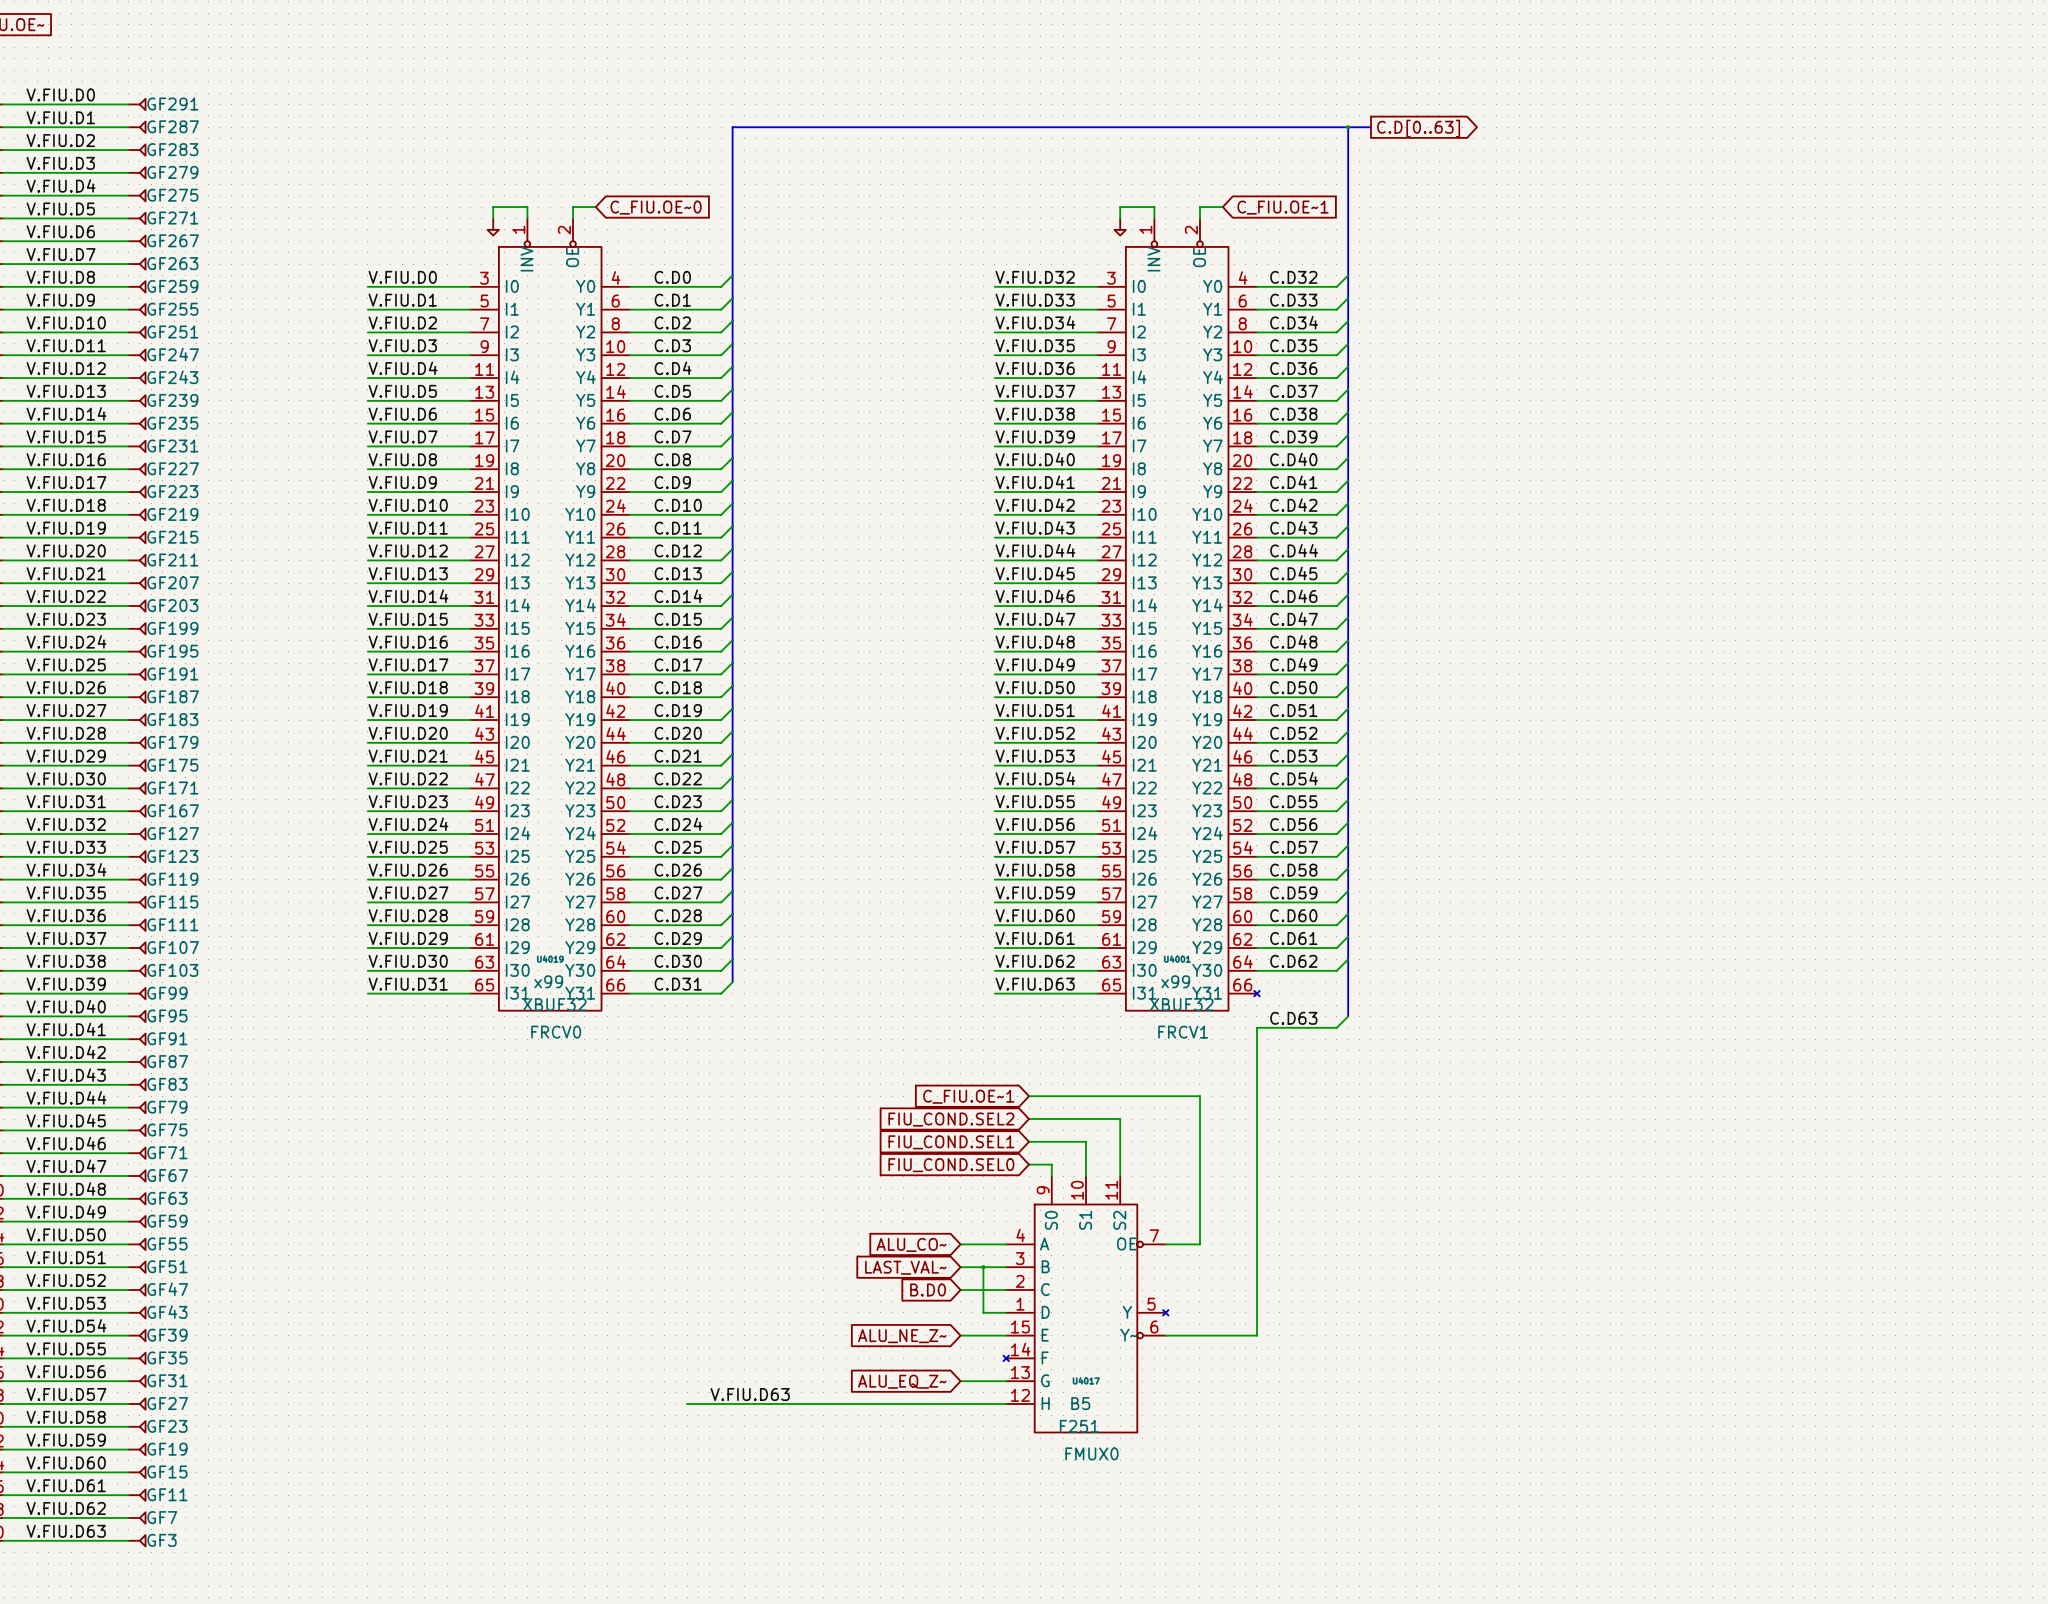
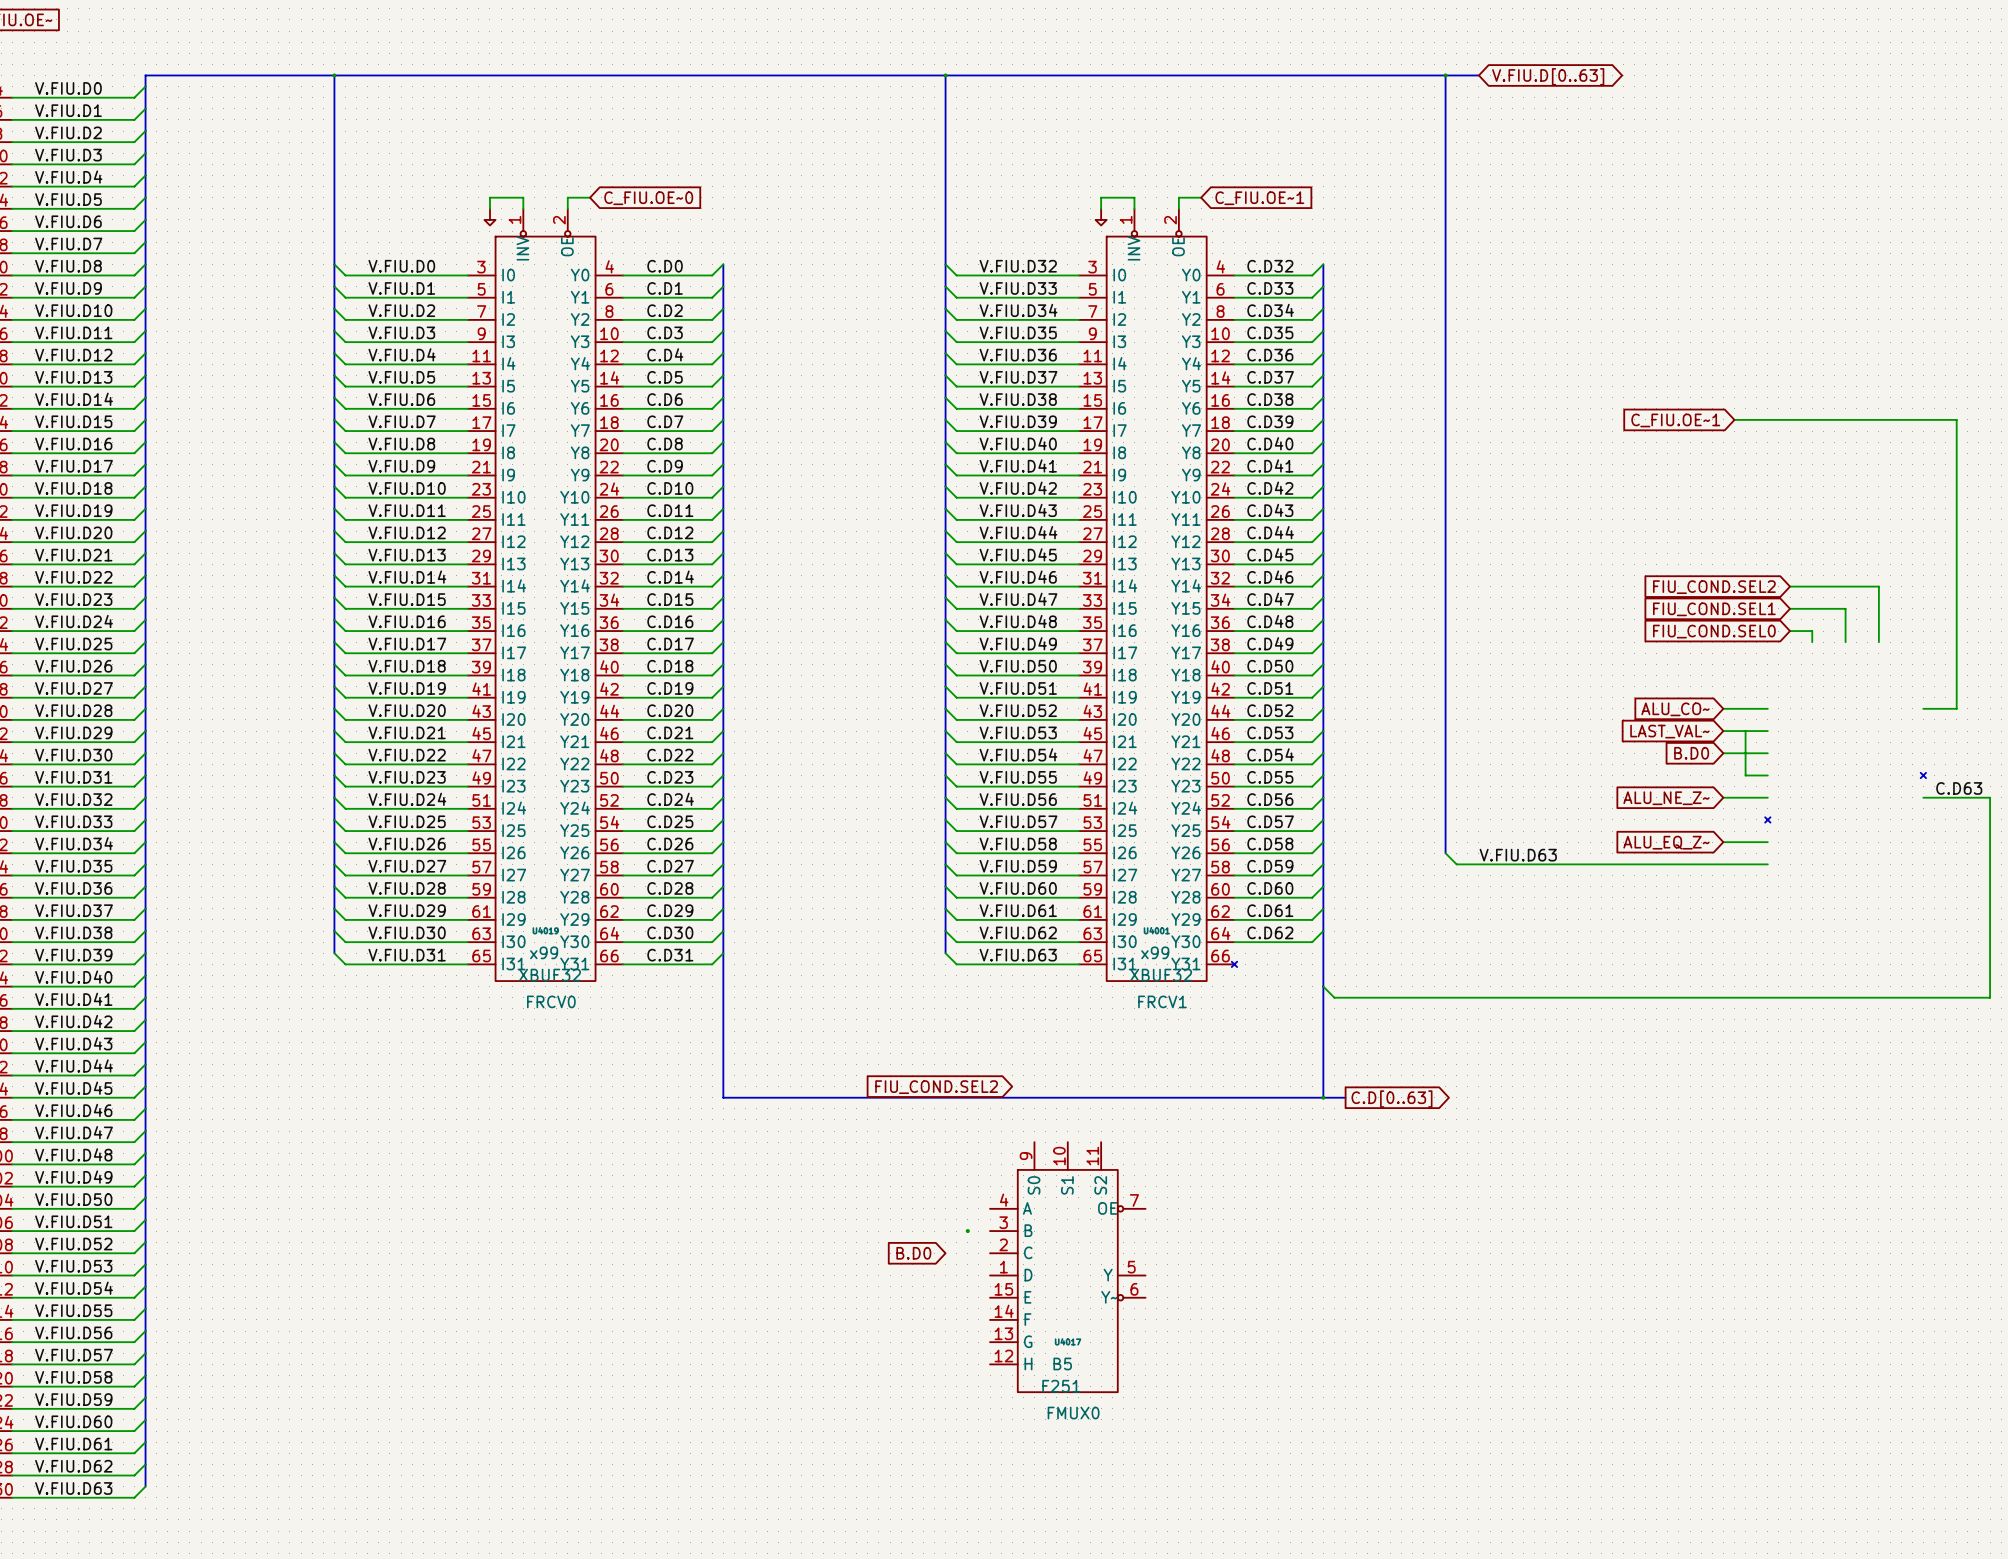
bus: none -> (334, 75) (334, 953)
junction: none -> (334, 75)
bus: none -> (945, 75) (945, 953)
junction: none -> (945, 75)
bus: none -> (1445, 75) (1445, 853)
junction: none -> (1445, 75)
bus: none -> (1478, 75) (145, 75) (145, 1486)
global label: none -> V.FIU.D[0..63] (1548, 76)
wire: none -> (145, 86) (134, 97)
GF291: (137, 104) -> none
wire: none -> (145, 108) (134, 119)
GF287: (137, 127) -> none
bus: (1348, 127) (1348, 275) -> none
junction: (1348, 127) -> none
bus: (1370, 127) (732, 127) (732, 275) -> none
global label: C.D[0..63] (1418, 128) -> none
wire: none -> (145, 131) (134, 142)
GF283: (137, 150) -> none
wire: none -> (145, 153) (134, 164)
GF279: (137, 172) -> none
wire: none -> (145, 175) (134, 186)
GF275: (137, 195) -> none
wire: none -> (145, 197) (134, 208)
GF271: (137, 218) -> none
wire: none -> (145, 219) (134, 231)
GF267: (137, 241) -> none
wire: none -> (145, 242) (134, 253)
GF263: (137, 264) -> none
wire: none -> (145, 264) (134, 275)
wire: none -> (334, 264) (345, 275) (367, 275)
wire: none -> (945, 264) (956, 275) (978, 275)
GF259: (137, 286) -> none
wire: none -> (145, 286) (134, 297)
wire: none -> (334, 286) (345, 297) (367, 297)
wire: none -> (945, 286) (956, 297) (978, 297)
GF255: (137, 309) -> none
wire: none -> (145, 308) (134, 319)
wire: none -> (334, 308) (345, 319) (367, 319)
wire: none -> (945, 308) (956, 319) (978, 319)
GF251: (137, 332) -> none
wire: none -> (145, 331) (134, 342)
wire: none -> (334, 331) (345, 342) (367, 342)
wire: none -> (945, 331) (956, 342) (978, 342)
GF247: (137, 355) -> none
wire: none -> (145, 353) (134, 364)
wire: none -> (334, 353) (345, 364) (367, 364)
wire: none -> (945, 353) (956, 364) (978, 364)
GF243: (137, 378) -> none
wire: none -> (145, 375) (134, 386)
wire: none -> (334, 375) (345, 386) (367, 386)
wire: none -> (945, 375) (956, 386) (978, 386)
GF239: (137, 400) -> none
wire: none -> (145, 397) (134, 408)
wire: none -> (334, 397) (345, 408) (367, 408)
wire: none -> (945, 397) (956, 408) (978, 408)
GF235: (137, 423) -> none
wire: none -> (145, 419) (134, 431)
wire: none -> (334, 419) (345, 431) (367, 431)
wire: none -> (945, 419) (956, 431) (978, 431)
global label: none -> C_FIU.OE~1 (1675, 420)
wire: none -> (1734, 419) (1956, 419) (1956, 708) (1923, 708)
GF231: (137, 446) -> none
wire: none -> (145, 442) (134, 453)
wire: none -> (334, 442) (345, 453) (367, 453)
wire: none -> (945, 442) (956, 453) (978, 453)
GF227: (137, 469) -> none
wire: none -> (145, 464) (134, 475)
wire: none -> (334, 464) (345, 475) (367, 475)
wire: none -> (945, 464) (956, 475) (978, 475)
GF223: (137, 492) -> none
wire: none -> (145, 486) (134, 497)
wire: none -> (334, 486) (345, 497) (367, 497)
wire: none -> (945, 486) (956, 497) (978, 497)
GF219: (137, 514) -> none
wire: none -> (145, 508) (134, 519)
wire: none -> (334, 508) (345, 519) (367, 519)
wire: none -> (945, 508) (956, 519) (978, 519)
GF215: (137, 537) -> none
wire: none -> (145, 531) (134, 542)
wire: none -> (334, 531) (345, 542) (367, 542)
wire: none -> (945, 531) (956, 542) (978, 542)
GF211: (137, 560) -> none
wire: none -> (145, 553) (134, 564)
wire: none -> (334, 553) (345, 564) (367, 564)
wire: none -> (945, 553) (956, 564) (978, 564)
GF207: (137, 583) -> none
wire: none -> (145, 575) (134, 586)
wire: none -> (334, 575) (345, 586) (367, 586)
wire: none -> (945, 575) (956, 586) (978, 586)
GF203: (137, 606) -> none
global label: none -> FIU_COND.SEL2 (1714, 587)
wire: none -> (1790, 586) (1878, 586) (1878, 642)
wire: none -> (145, 597) (134, 608)
wire: none -> (334, 597) (345, 608) (367, 608)
wire: none -> (945, 597) (956, 608) (978, 608)
GF199: (137, 628) -> none
wire: none -> (1790, 608) (1845, 608) (1845, 642)
global label: none -> FIU_COND.SEL1 (1714, 609)
wire: none -> (145, 619) (134, 631)
wire: none -> (334, 619) (345, 631) (367, 631)
wire: none -> (945, 619) (956, 631) (978, 631)
GF195: (137, 651) -> none
wire: none -> (1790, 631) (1812, 631) (1812, 642)
global label: none -> FIU_COND.SEL0 (1714, 631)
wire: none -> (145, 642) (134, 653)
wire: none -> (334, 642) (345, 653) (367, 653)
wire: none -> (945, 642) (956, 653) (978, 653)
GF191: (137, 674) -> none
wire: none -> (145, 664) (134, 675)
wire: none -> (334, 664) (345, 675) (367, 675)
wire: none -> (945, 664) (956, 675) (978, 675)
GF187: (137, 697) -> none
wire: none -> (145, 686) (134, 697)
wire: none -> (334, 686) (345, 697) (367, 697)
wire: none -> (945, 686) (956, 697) (978, 697)
GF183: (137, 720) -> none
wire: none -> (145, 708) (134, 719)
wire: none -> (334, 708) (345, 719) (367, 719)
wire: none -> (945, 708) (956, 719) (978, 719)
global label: none -> ALU_CO~ (1675, 709)
wire: none -> (1723, 708) (1767, 708)
GF179: (137, 742) -> none
wire: none -> (145, 731) (134, 742)
wire: none -> (334, 731) (345, 742) (367, 742)
wire: none -> (945, 731) (956, 742) (978, 742)
global label: none -> LAST_VAL~ (1669, 731)
wire: none -> (1723, 731) (1767, 731)
wire: none -> (1745, 731) (1745, 775) (1767, 775)
GF175: (137, 765) -> none
wire: none -> (145, 753) (134, 764)
wire: none -> (334, 753) (345, 764) (367, 764)
wire: none -> (945, 753) (956, 764) (978, 764)
global label: none -> B.D0 (1691, 753)
wire: none -> (1723, 753) (1767, 753)
GF171: (137, 788) -> none
wire: none -> (145, 775) (134, 786)
wire: none -> (334, 775) (345, 786) (367, 786)
wire: none -> (945, 775) (956, 786) (978, 786)
no-connect mark: none -> (1923, 775)
GF167: (137, 811) -> none
label: none -> C.D63 (1959, 788)
wire: none -> (145, 797) (134, 808)
wire: none -> (334, 797) (345, 808) (367, 808)
wire: none -> (945, 797) (956, 808) (978, 808)
wire: none -> (1723, 797) (1767, 797)
global label: none -> ALU_NE_Z~ (1666, 798)
GF127: (137, 834) -> none
wire: none -> (145, 819) (134, 831)
wire: none -> (334, 819) (345, 831) (367, 831)
wire: none -> (945, 819) (956, 831) (978, 831)
no-connect mark: none -> (1767, 819)
GF123: (137, 856) -> none
wire: none -> (145, 842) (134, 853)
wire: none -> (334, 842) (345, 853) (367, 853)
wire: none -> (945, 842) (956, 853) (978, 853)
global label: none -> ALU_EQ_Z~ (1666, 842)
wire: none -> (1723, 842) (1767, 842)
GF119: (137, 879) -> none
wire: none -> (1445, 853) (1456, 864) (1767, 864)
label: none -> V.FIU.D63 (1518, 855)
wire: none -> (145, 864) (134, 875)
wire: none -> (334, 864) (345, 875) (367, 875)
wire: none -> (945, 864) (956, 875) (978, 875)
GF115: (137, 902) -> none
wire: none -> (145, 886) (134, 897)
wire: none -> (334, 886) (345, 897) (367, 897)
wire: none -> (945, 886) (956, 897) (978, 897)
GF111: (137, 925) -> none
wire: none -> (145, 908) (134, 919)
wire: none -> (334, 908) (345, 919) (367, 919)
wire: none -> (945, 908) (956, 919) (978, 919)
GF107: (137, 948) -> none
wire: none -> (145, 931) (134, 942)
wire: none -> (334, 931) (345, 942) (367, 942)
wire: none -> (945, 931) (956, 942) (978, 942)
GF103: (137, 970) -> none
wire: none -> (145, 953) (134, 964)
wire: none -> (334, 953) (345, 964) (367, 964)
bus: none -> (723, 953) (723, 1097) (1345, 1097)
wire: none -> (945, 953) (956, 964) (978, 964)
GF99: (137, 993) -> none
wire: none -> (145, 975) (134, 986)
GF95: (137, 1016) -> none
wire: (1348, 1016) (1336, 1027) (1256, 1027) (1256, 1335) (1165, 1335) -> (1323, 986) (1334, 997) (1990, 997) (1990, 797) (1923, 797)
bus: none -> (1323, 986) (1323, 1097)
label: C.D63 (1293, 1018) -> none
wire: none -> (145, 997) (134, 1008)
GF91: (137, 1039) -> none
wire: none -> (145, 1019) (134, 1031)
GF87: (137, 1062) -> none
wire: none -> (145, 1042) (134, 1053)
GF83: (137, 1084) -> none
wire: none -> (145, 1064) (134, 1075)
global label: C_FIU.OE~1 (968, 1096) -> none
wire: (1029, 1096) (1199, 1096) (1199, 1244) (1165, 1244) -> none
GF79: (137, 1107) -> none
wire: none -> (145, 1086) (134, 1097)
wire: (1029, 1119) (1120, 1119) (1120, 1176) -> none
GF75: (137, 1130) -> none
junction: none -> (1323, 1097)
global label: none -> C.D[0..63] (1391, 1099)
wire: none -> (145, 1108) (134, 1119)
wire: (1029, 1141) (1086, 1141) (1086, 1176) -> none
global label: FIU_COND.SEL1 (951, 1142) -> none
GF71: (137, 1153) -> none
wire: none -> (145, 1131) (134, 1142)
wire: (1029, 1164) (1051, 1164) (1051, 1176) -> none
global label: FIU_COND.SEL0 (951, 1165) -> none
GF67: (137, 1176) -> none
wire: none -> (145, 1153) (134, 1164)
GF63: (137, 1198) -> none
wire: none -> (145, 1175) (134, 1186)
GF59: (137, 1221) -> none
wire: none -> (145, 1197) (134, 1208)
GF55: (137, 1244) -> none
global label: ALU_CO~ (911, 1244) -> none
wire: (960, 1244) (1006, 1244) -> none
wire: none -> (145, 1219) (134, 1231)
GF51: (137, 1267) -> none
global label: LAST_VAL~ (905, 1267) -> none
wire: (960, 1267) (1006, 1267) -> none
wire: (983, 1267) (983, 1312) (1006, 1312) -> none
wire: none -> (145, 1242) (134, 1253)
GF47: (137, 1290) -> none
wire: (960, 1290) (1006, 1290) -> none
wire: none -> (145, 1264) (134, 1275)
GF43: (137, 1312) -> none
no-connect mark: (1165, 1312) -> none
wire: none -> (145, 1286) (134, 1297)
GF39: (137, 1335) -> none
wire: (960, 1335) (1006, 1335) -> none
global label: ALU_NE_Z~ (902, 1336) -> none
wire: none -> (145, 1308) (134, 1319)
GF35: (137, 1358) -> none
no-connect mark: (1006, 1358) -> none
wire: none -> (145, 1331) (134, 1342)
GF31: (137, 1381) -> none
global label: ALU_EQ_Z~ (902, 1381) -> none
wire: (960, 1381) (1006, 1381) -> none
wire: none -> (145, 1353) (134, 1364)
label: V.FIU.D63 (750, 1394) -> none
GF27: (137, 1404) -> none
wire: (687, 1404) (1006, 1404) -> none
wire: none -> (145, 1375) (134, 1386)
GF23: (137, 1426) -> none
wire: none -> (145, 1397) (134, 1408)
GF19: (137, 1449) -> none
wire: none -> (145, 1419) (134, 1431)
GF15: (137, 1472) -> none
wire: none -> (145, 1442) (134, 1453)
GF11: (137, 1495) -> none
wire: none -> (145, 1464) (134, 1475)
GF7: (137, 1517) -> none
wire: none -> (145, 1486) (134, 1497)
GF3: (137, 1540) -> none

